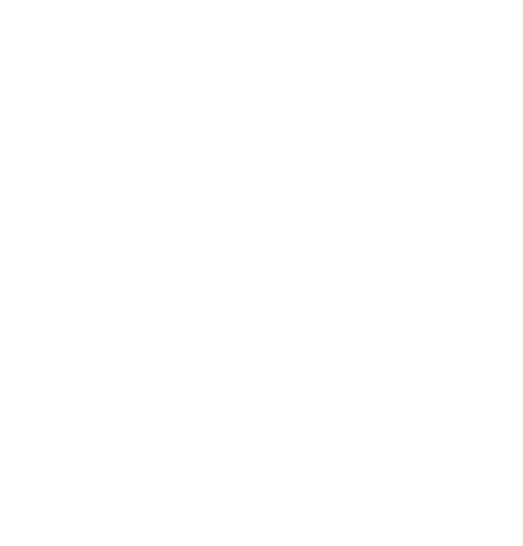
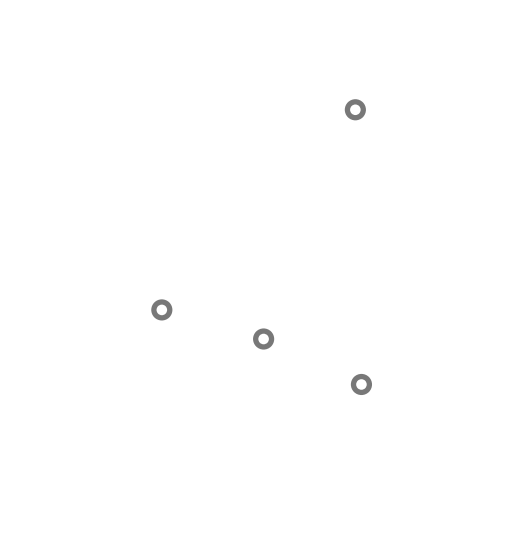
via: none -> (355, 109)
via: none -> (161, 309)
via: none -> (263, 339)
via: none -> (361, 384)

